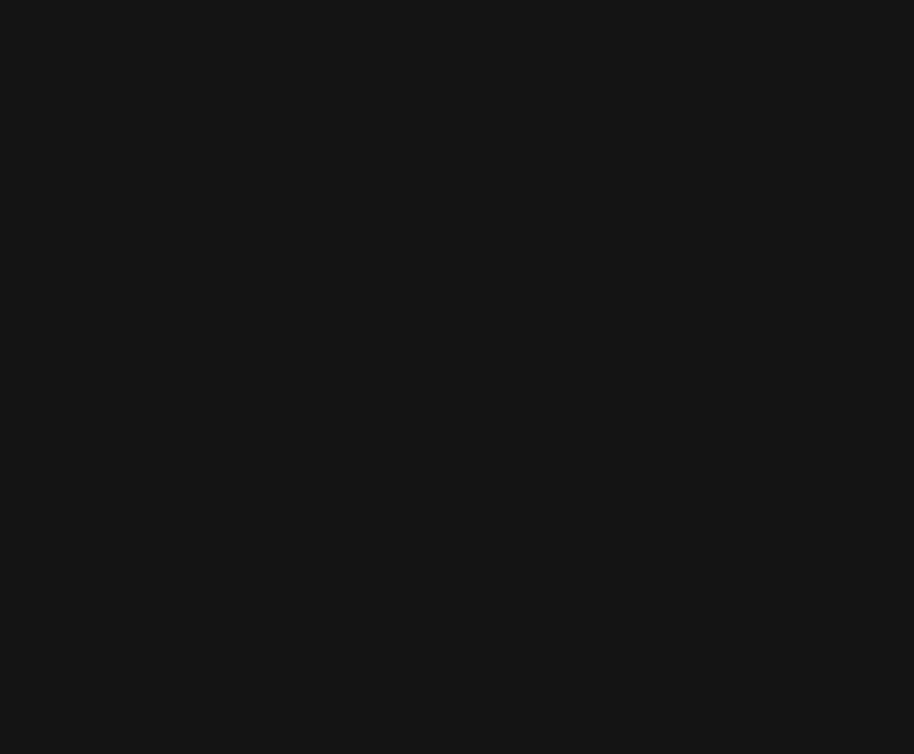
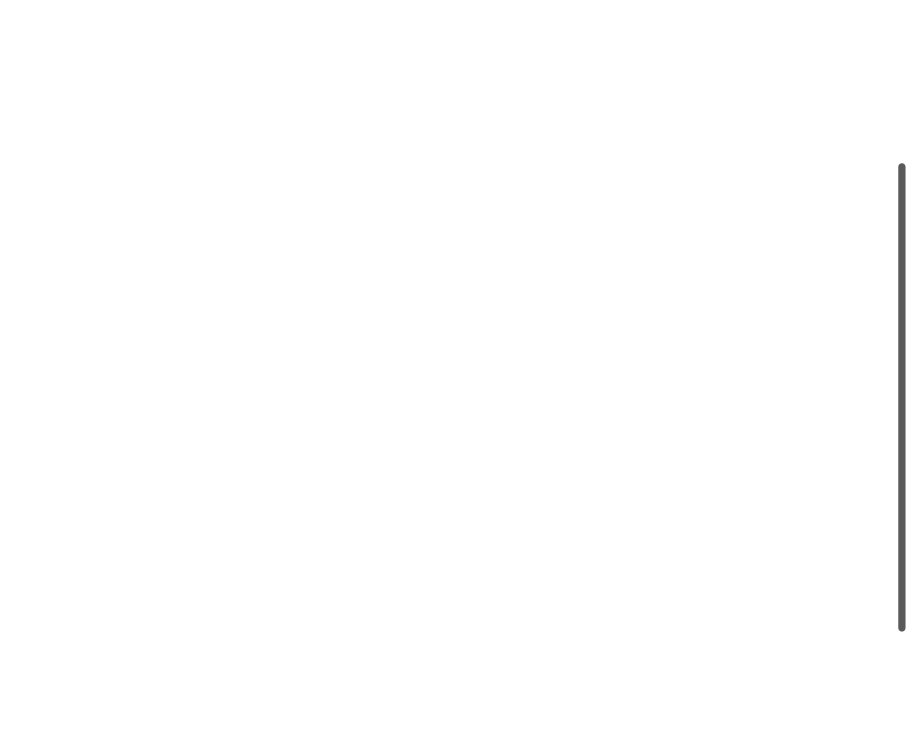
line: none -> (901, 166) (901, 628)

